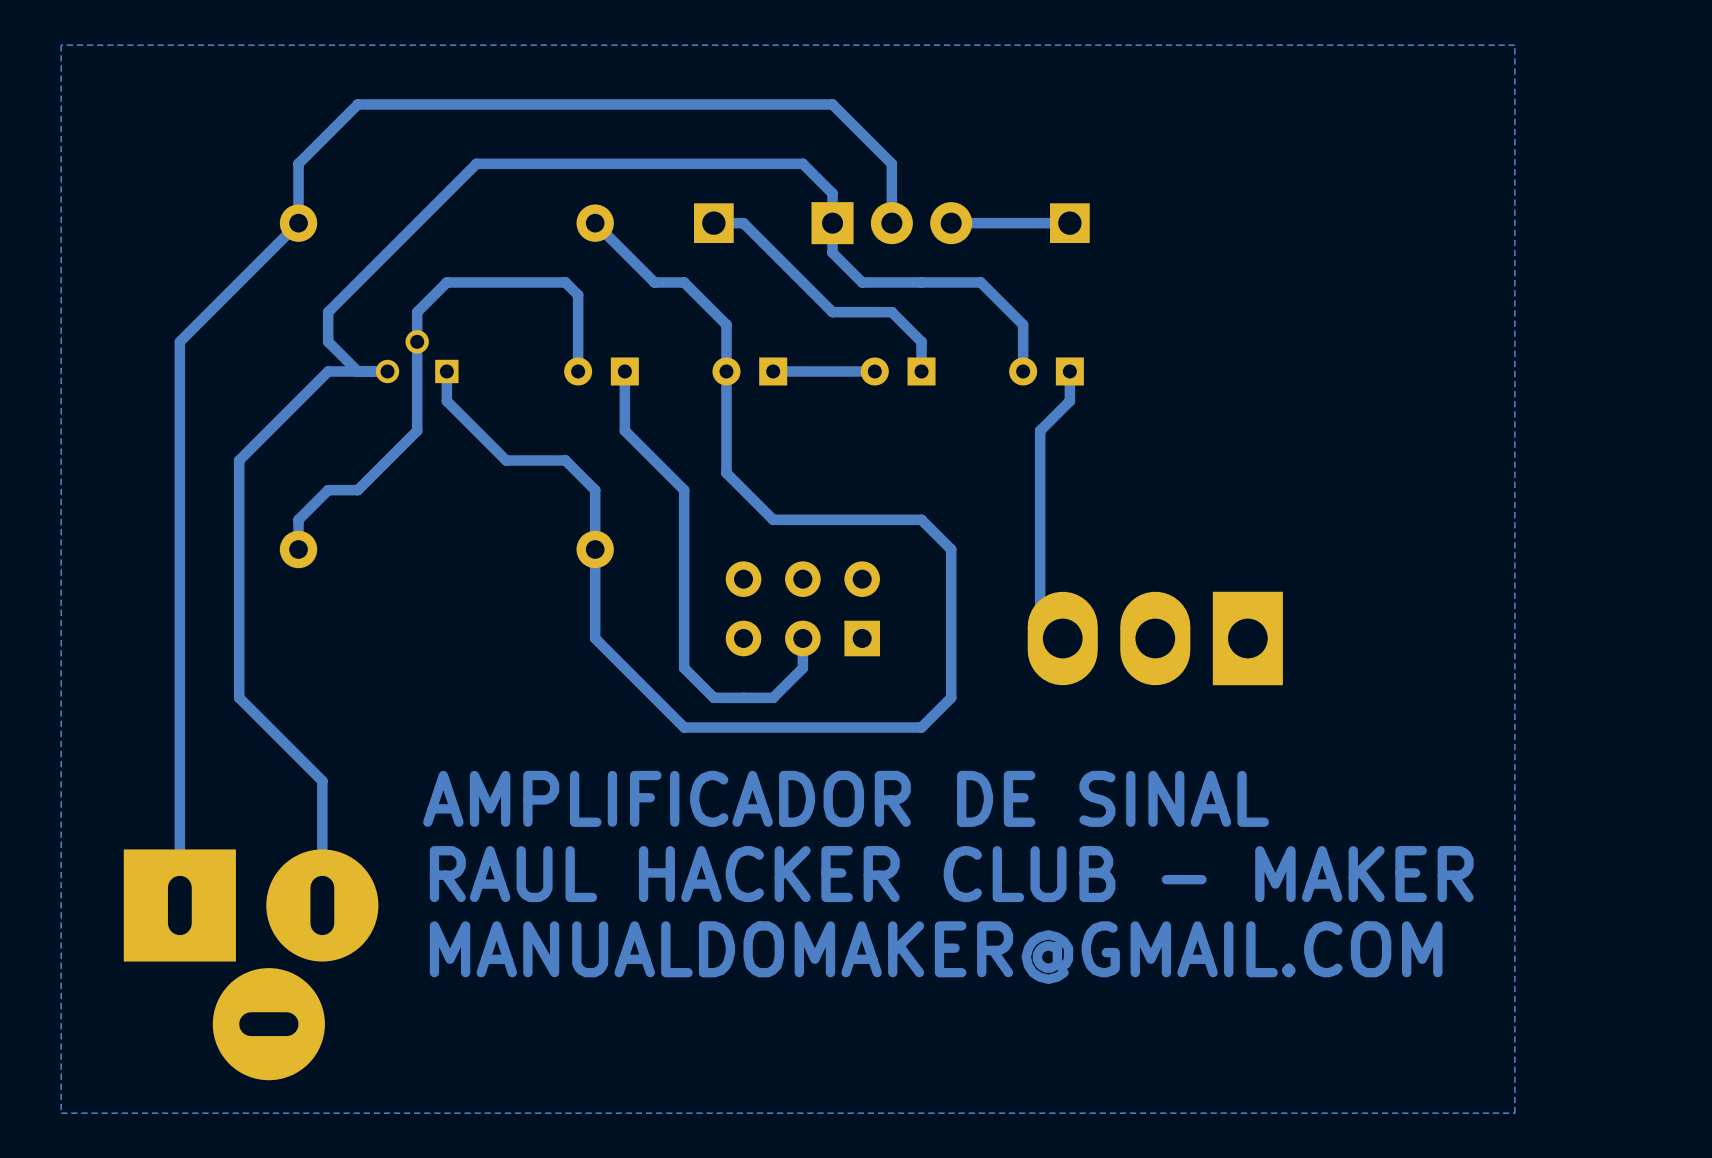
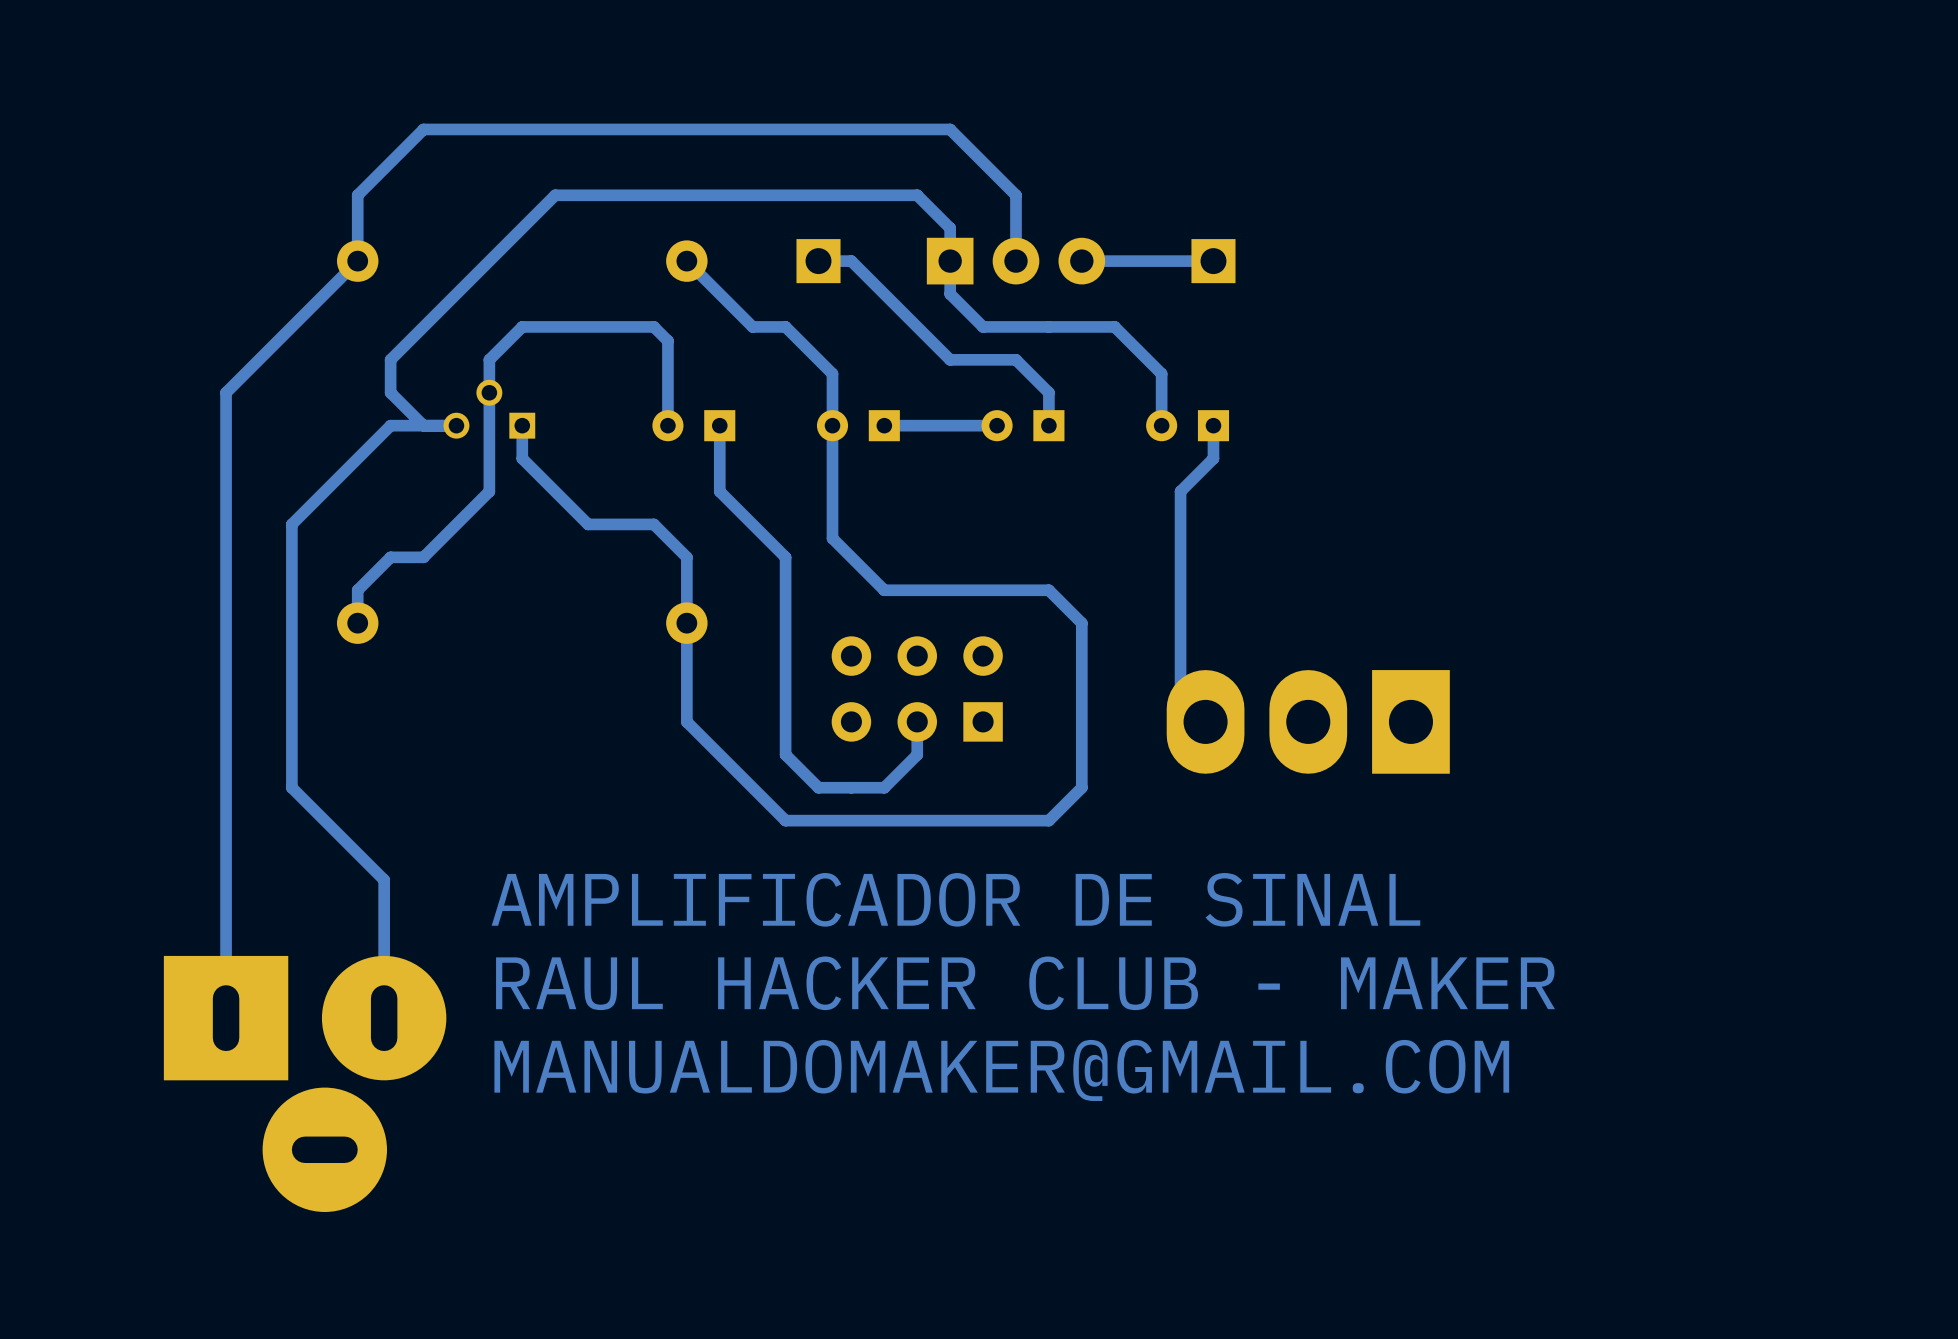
bottom zone outline: (1514, 45) (1514, 1113) (61, 1113) (61, 45) (1514, 45) -> none

